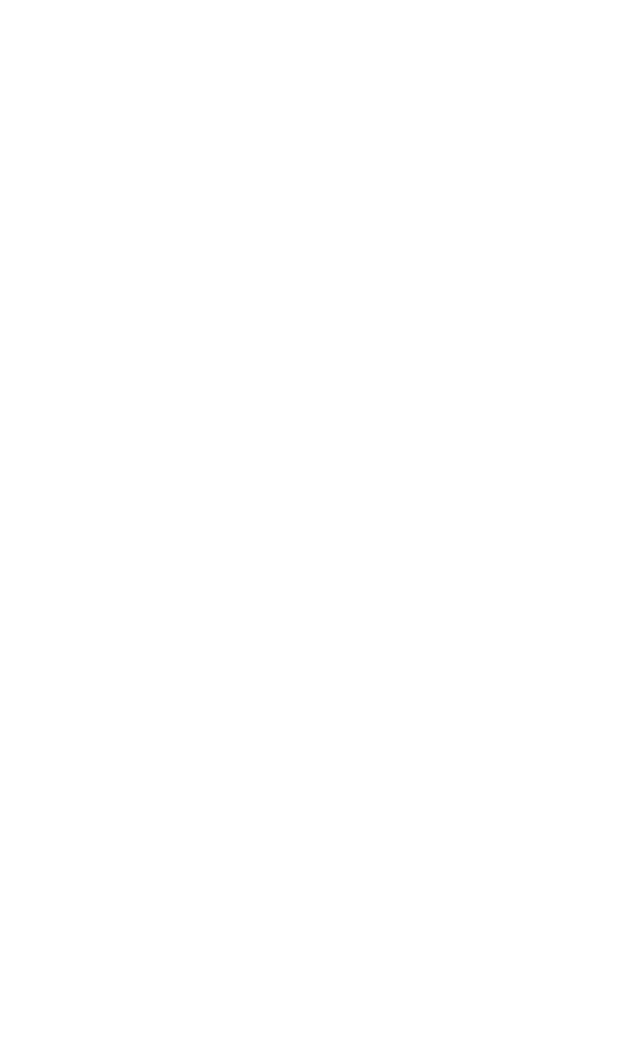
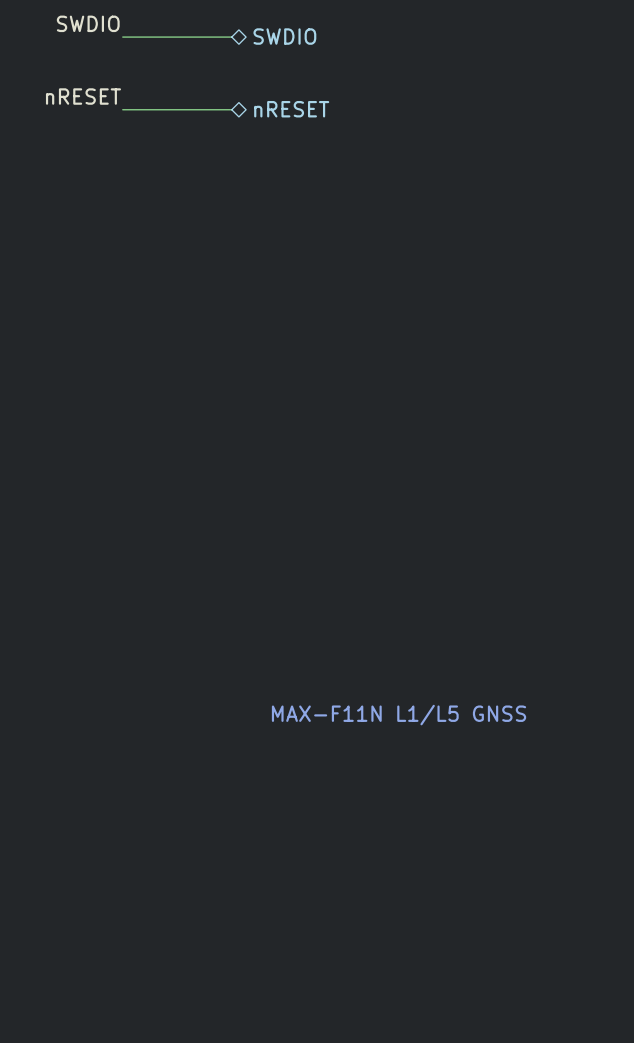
label: none -> SWDIO (88, 23)
sheet pin: none -> SWDIO (284, 36)
wire: none -> (122, 37) (231, 37)
label: none -> nRESET (83, 96)
wire: none -> (122, 109) (231, 109)
sheet pin: none -> nRESET (291, 109)
text: none -> MAX-F11N L1/L5 GNSS (399, 715)

